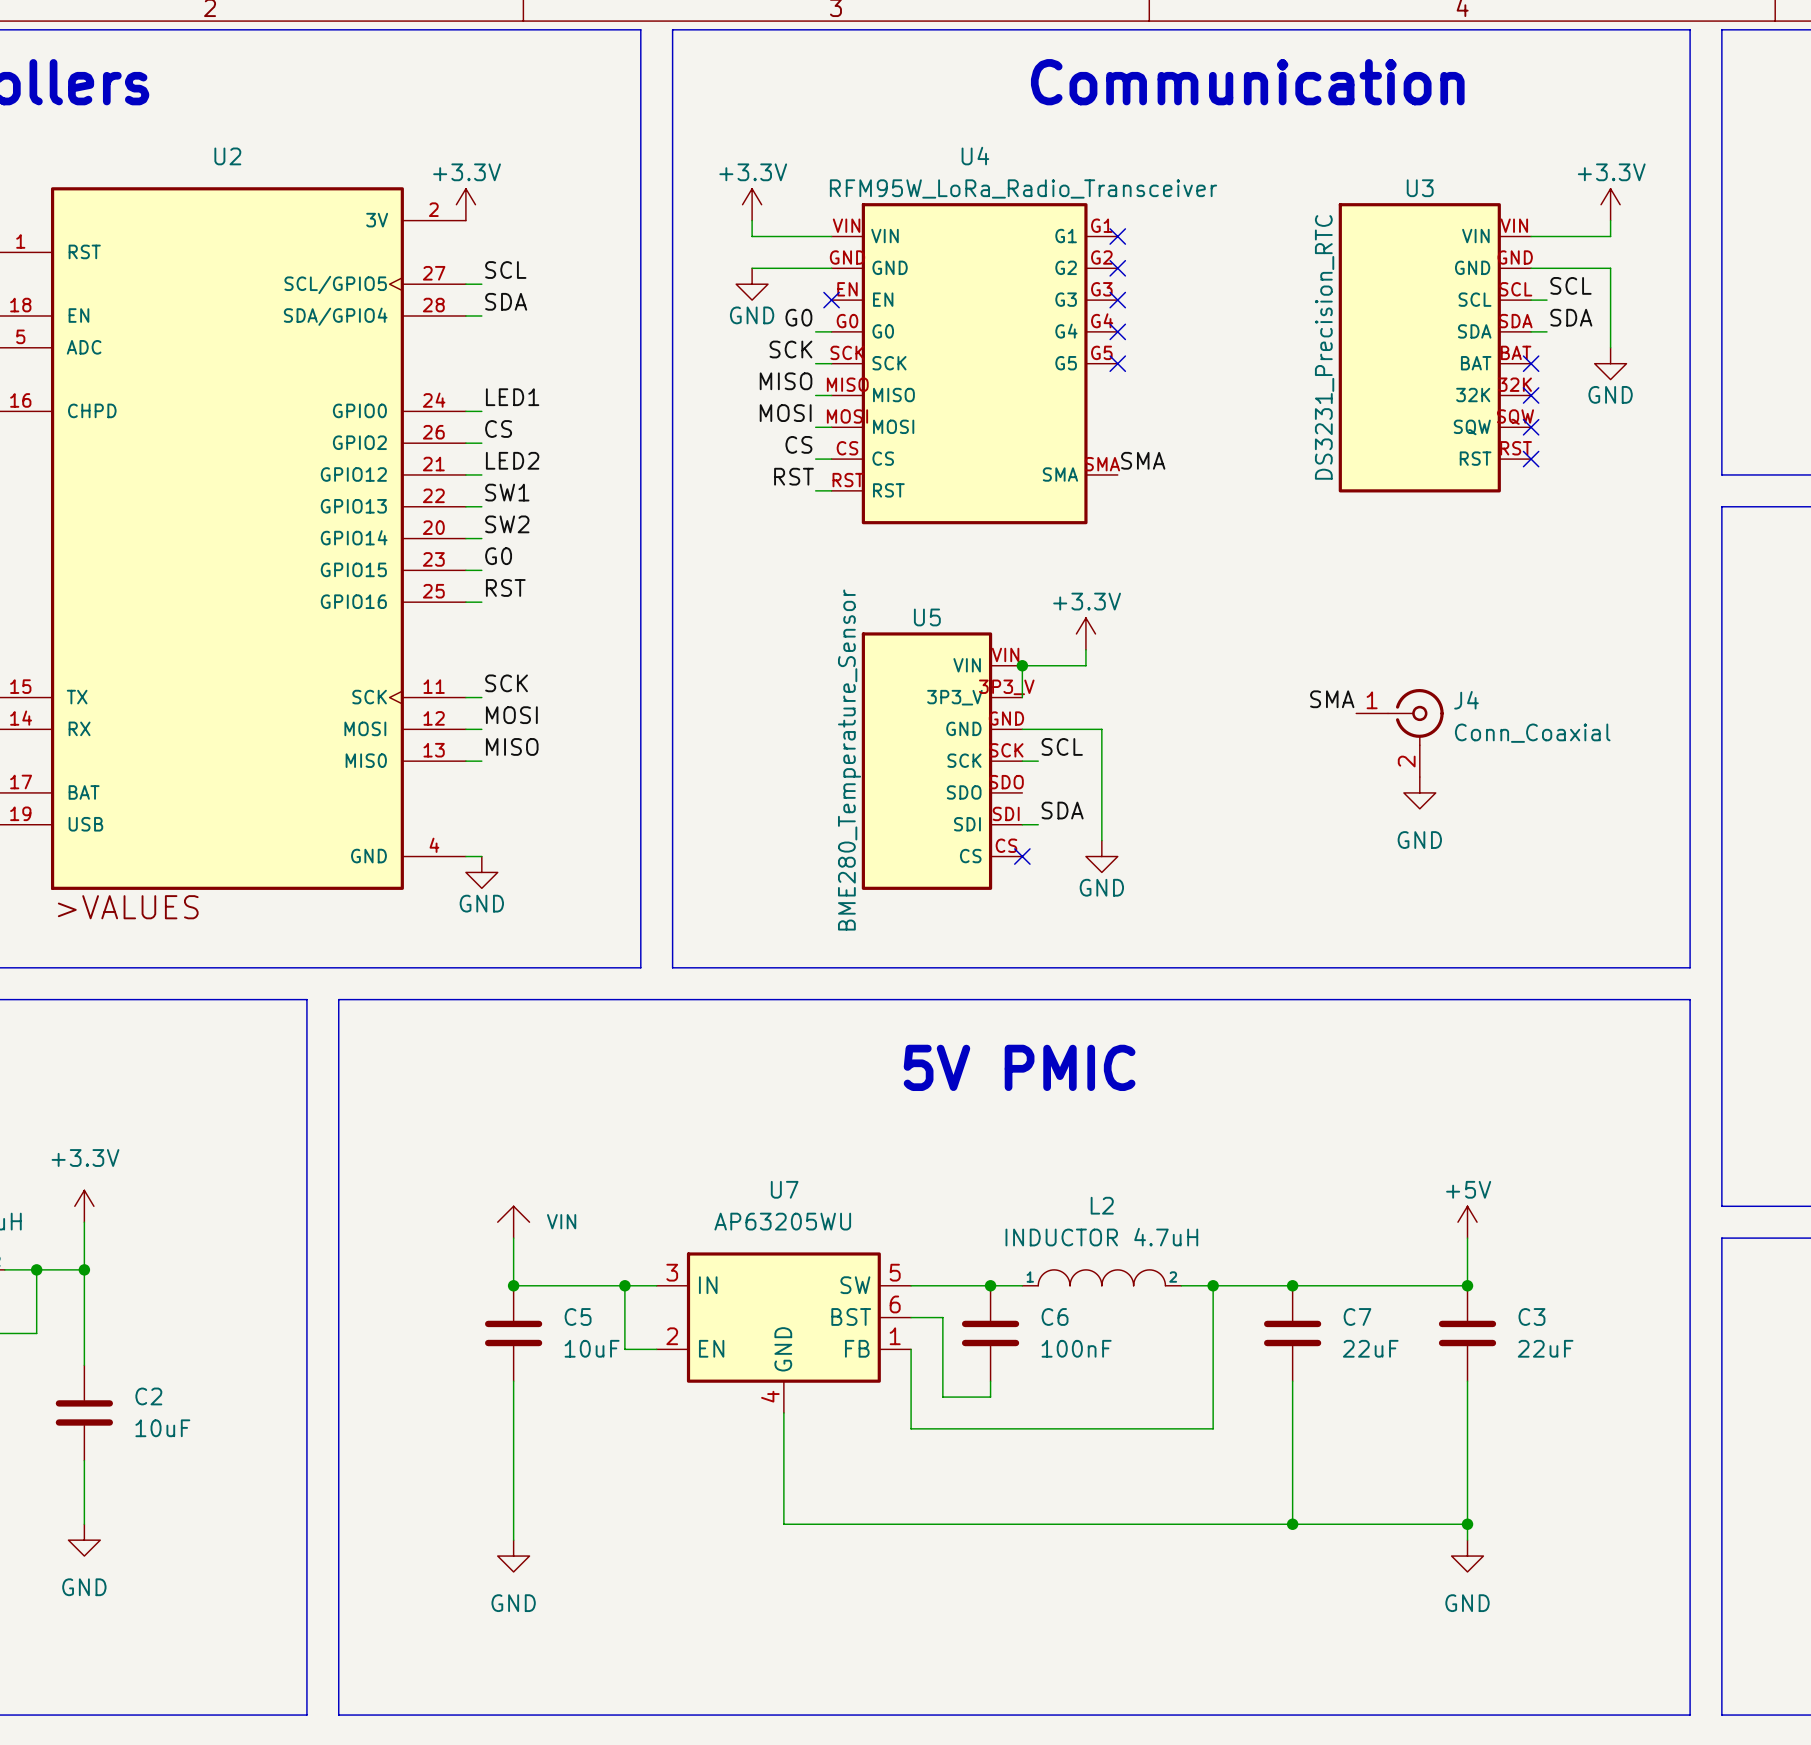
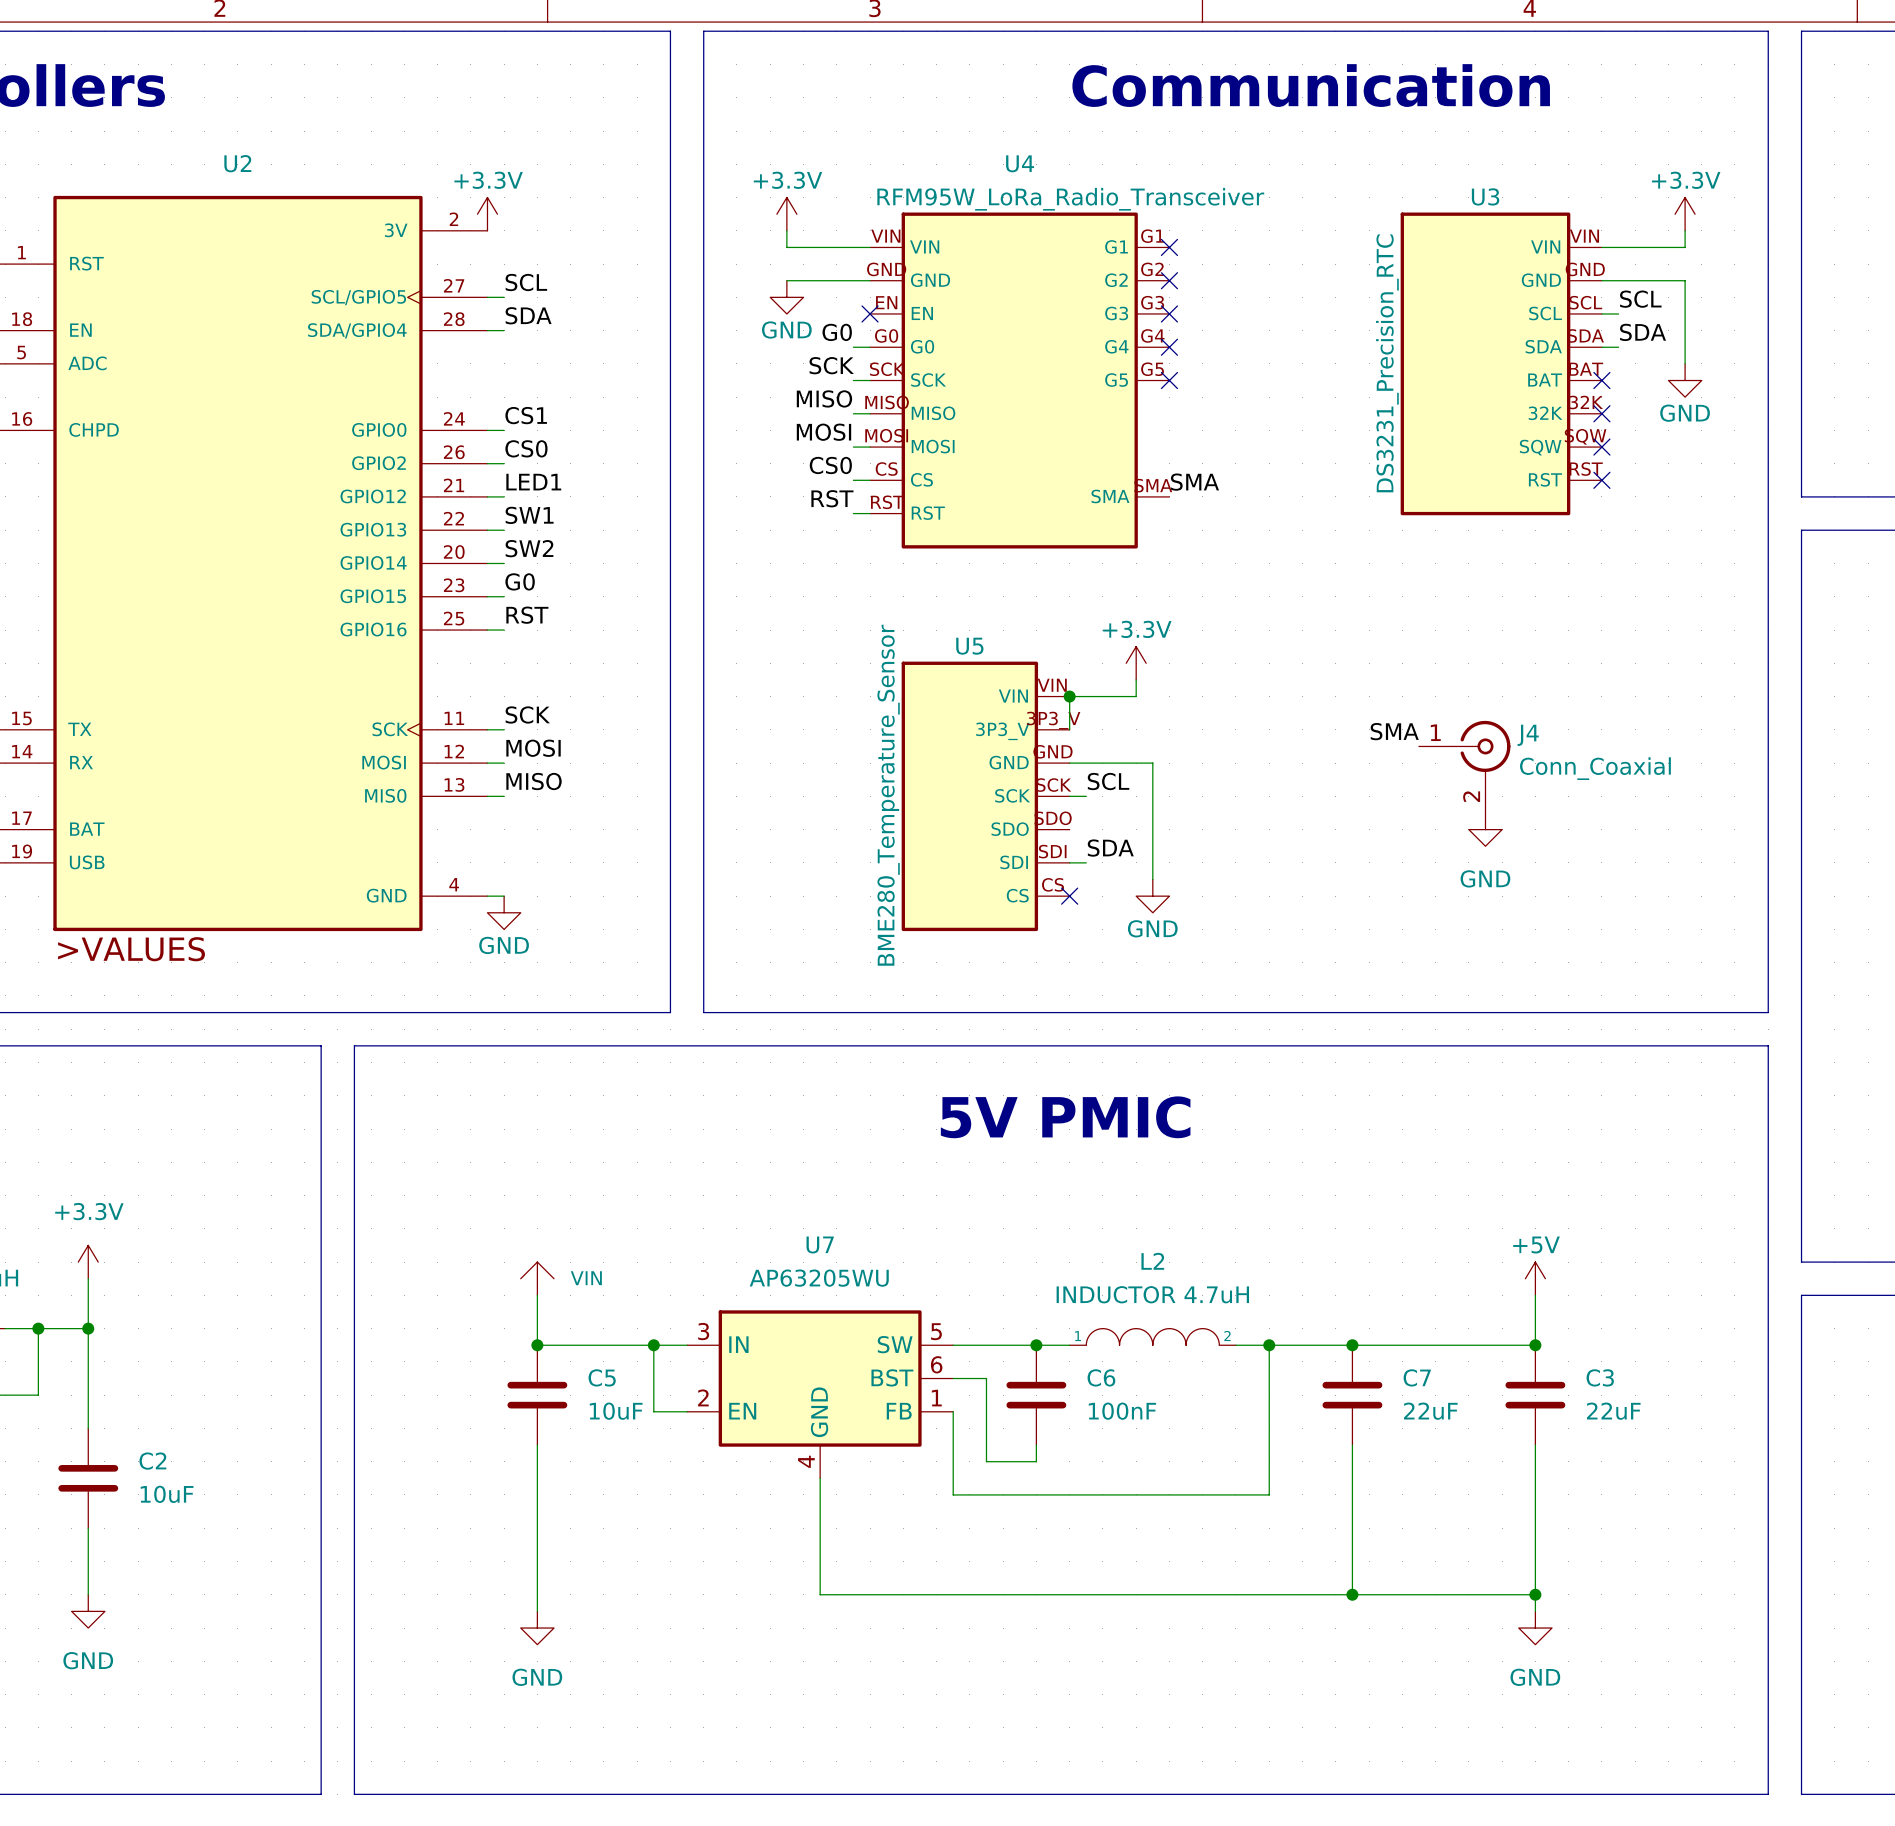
label: LED1 (512, 397) -> CS1 (526, 415)
label: CS (498, 428) -> CS0 (526, 448)
label: CS (798, 444) -> CS0 (830, 465)
label: LED2 (512, 460) -> LED1 (533, 482)

